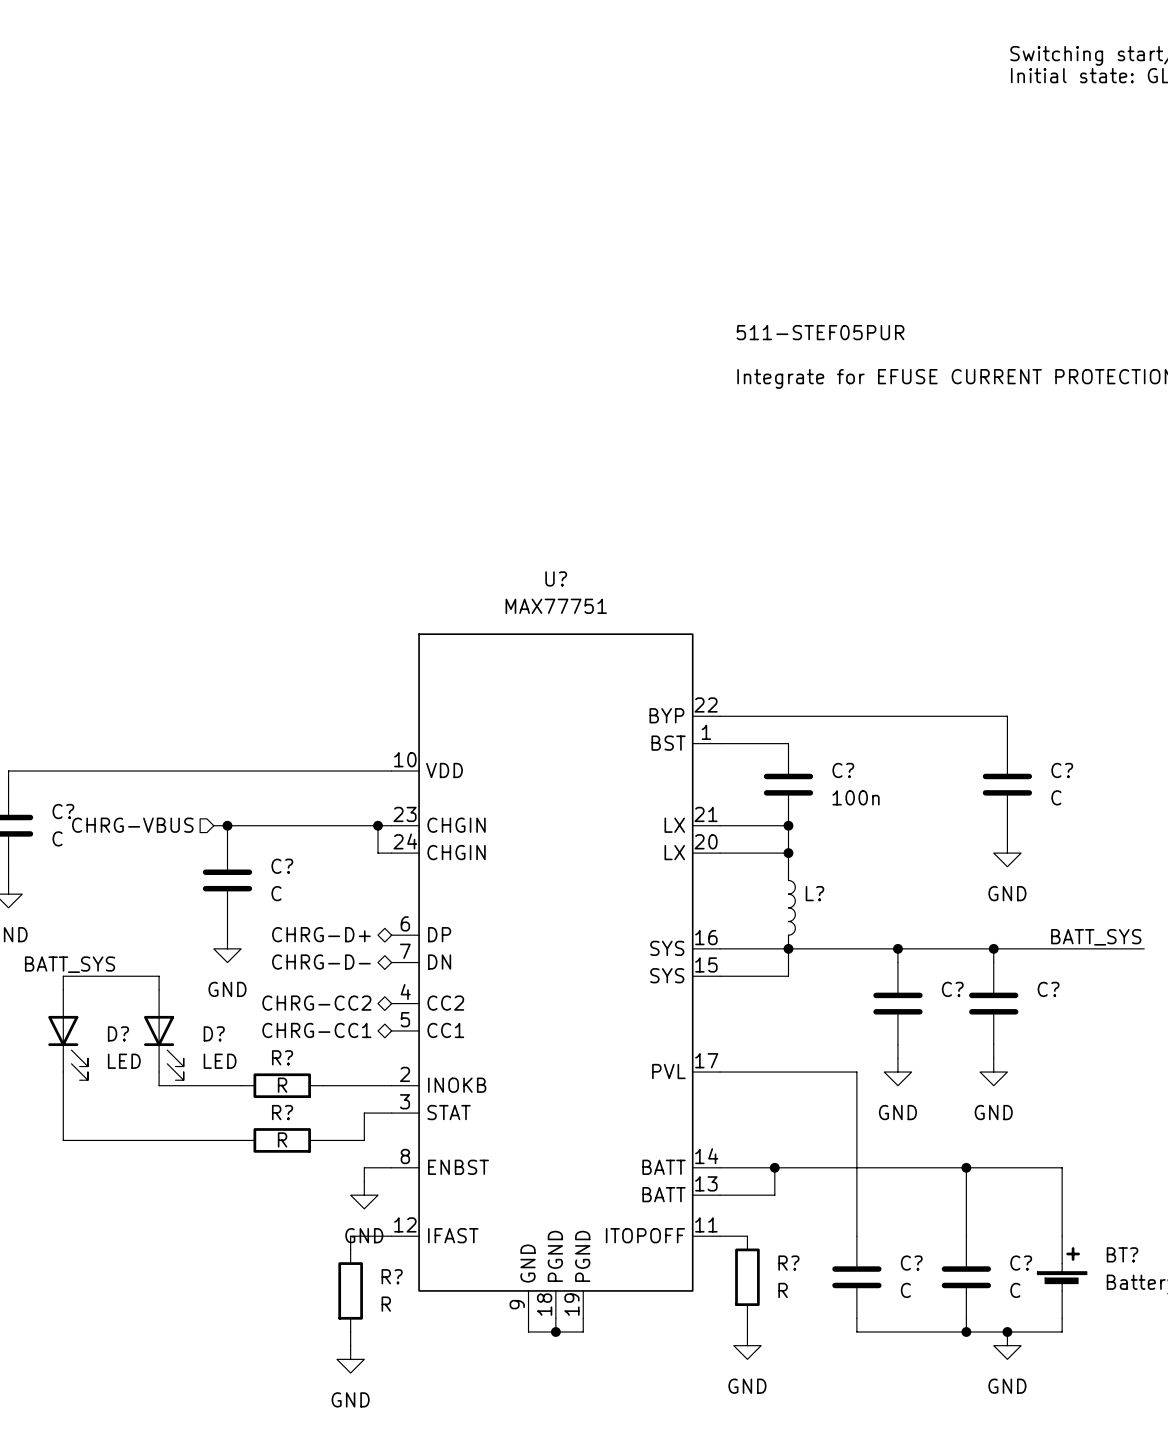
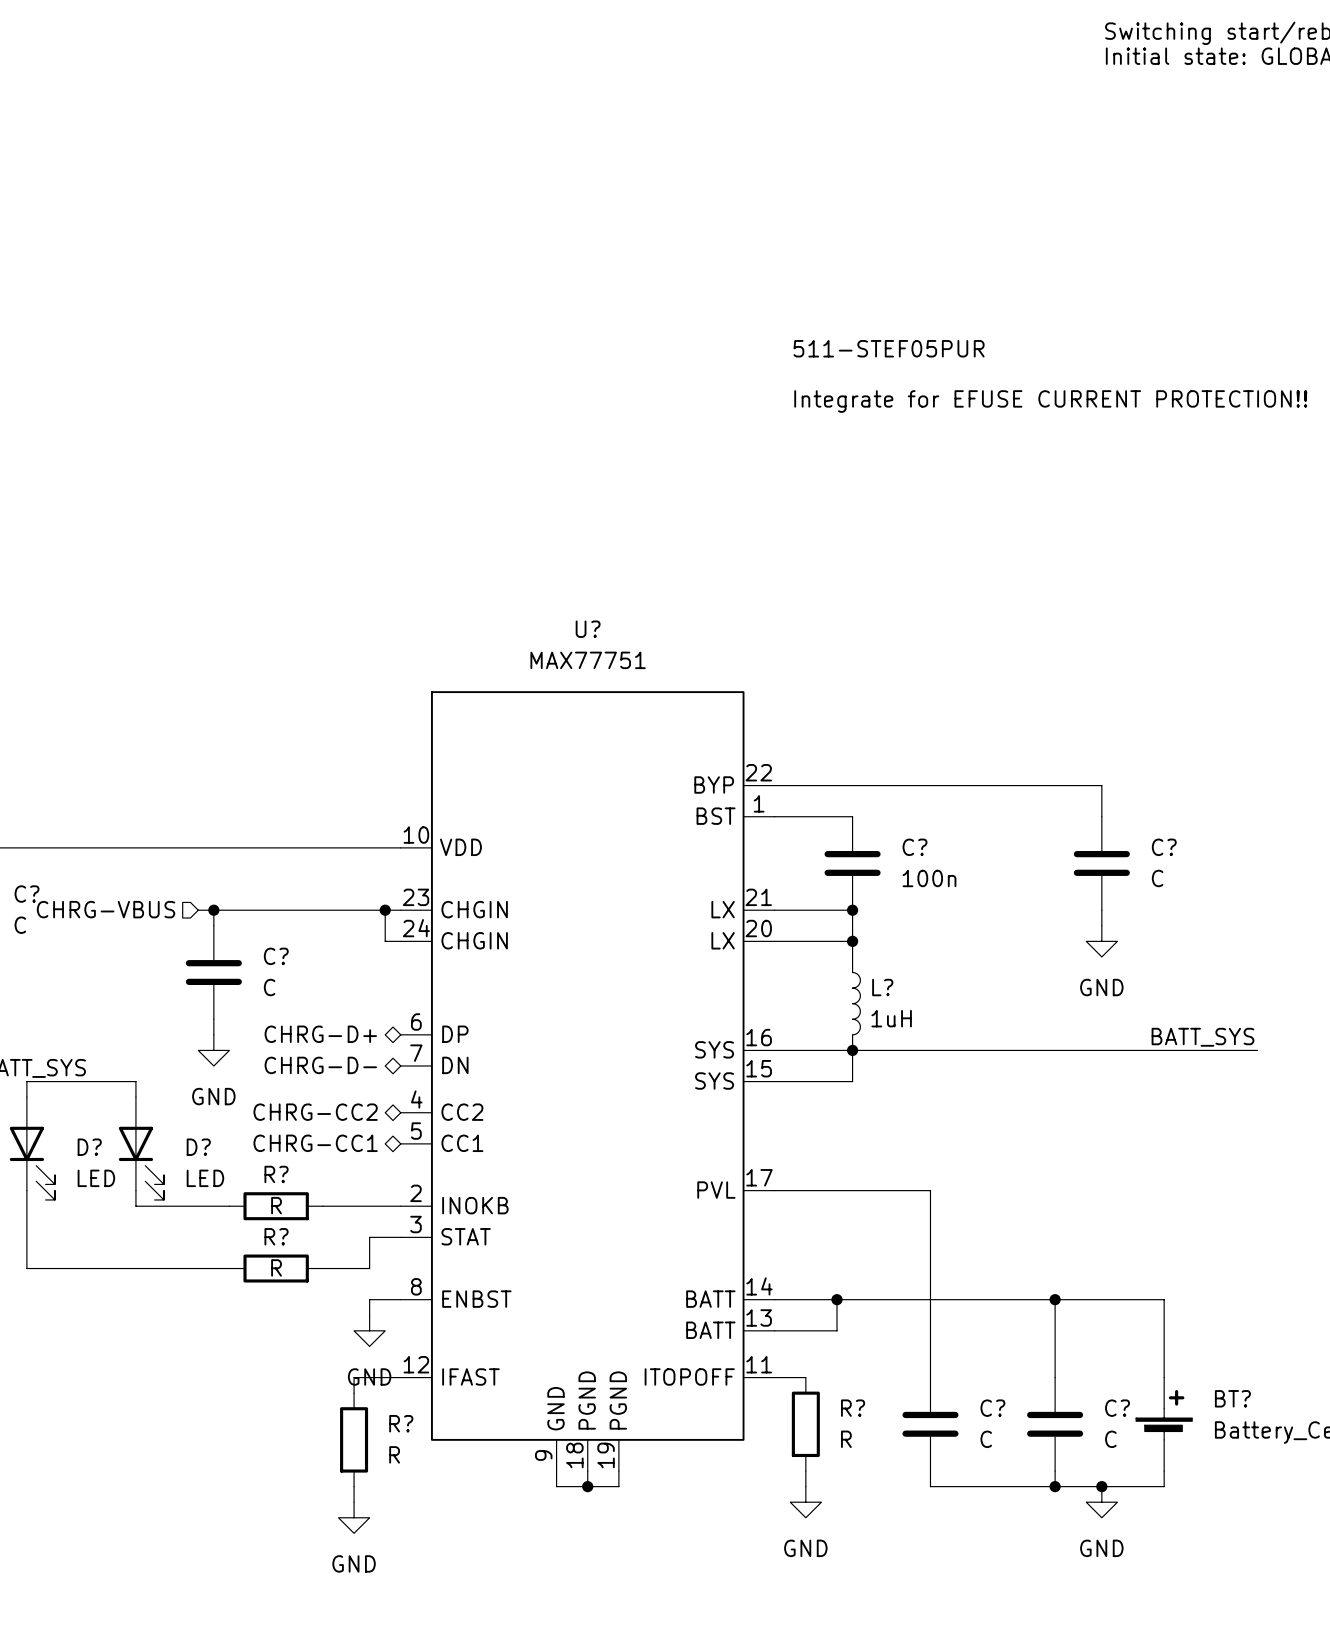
L? value: none -> 1uH (891, 1018)
wire: (897, 948) (897, 962) -> none
junction: (897, 948) -> none
wire: (993, 948) (993, 962) -> none
junction: (993, 948) -> none
C?: (897, 1003) -> none
C?: (993, 1003) -> none
wire: (897, 1044) (897, 1058) -> none
wire: (993, 1044) (993, 1058) -> none
power symbol: GND (897, 1072) -> none
power symbol: GND (993, 1072) -> none

